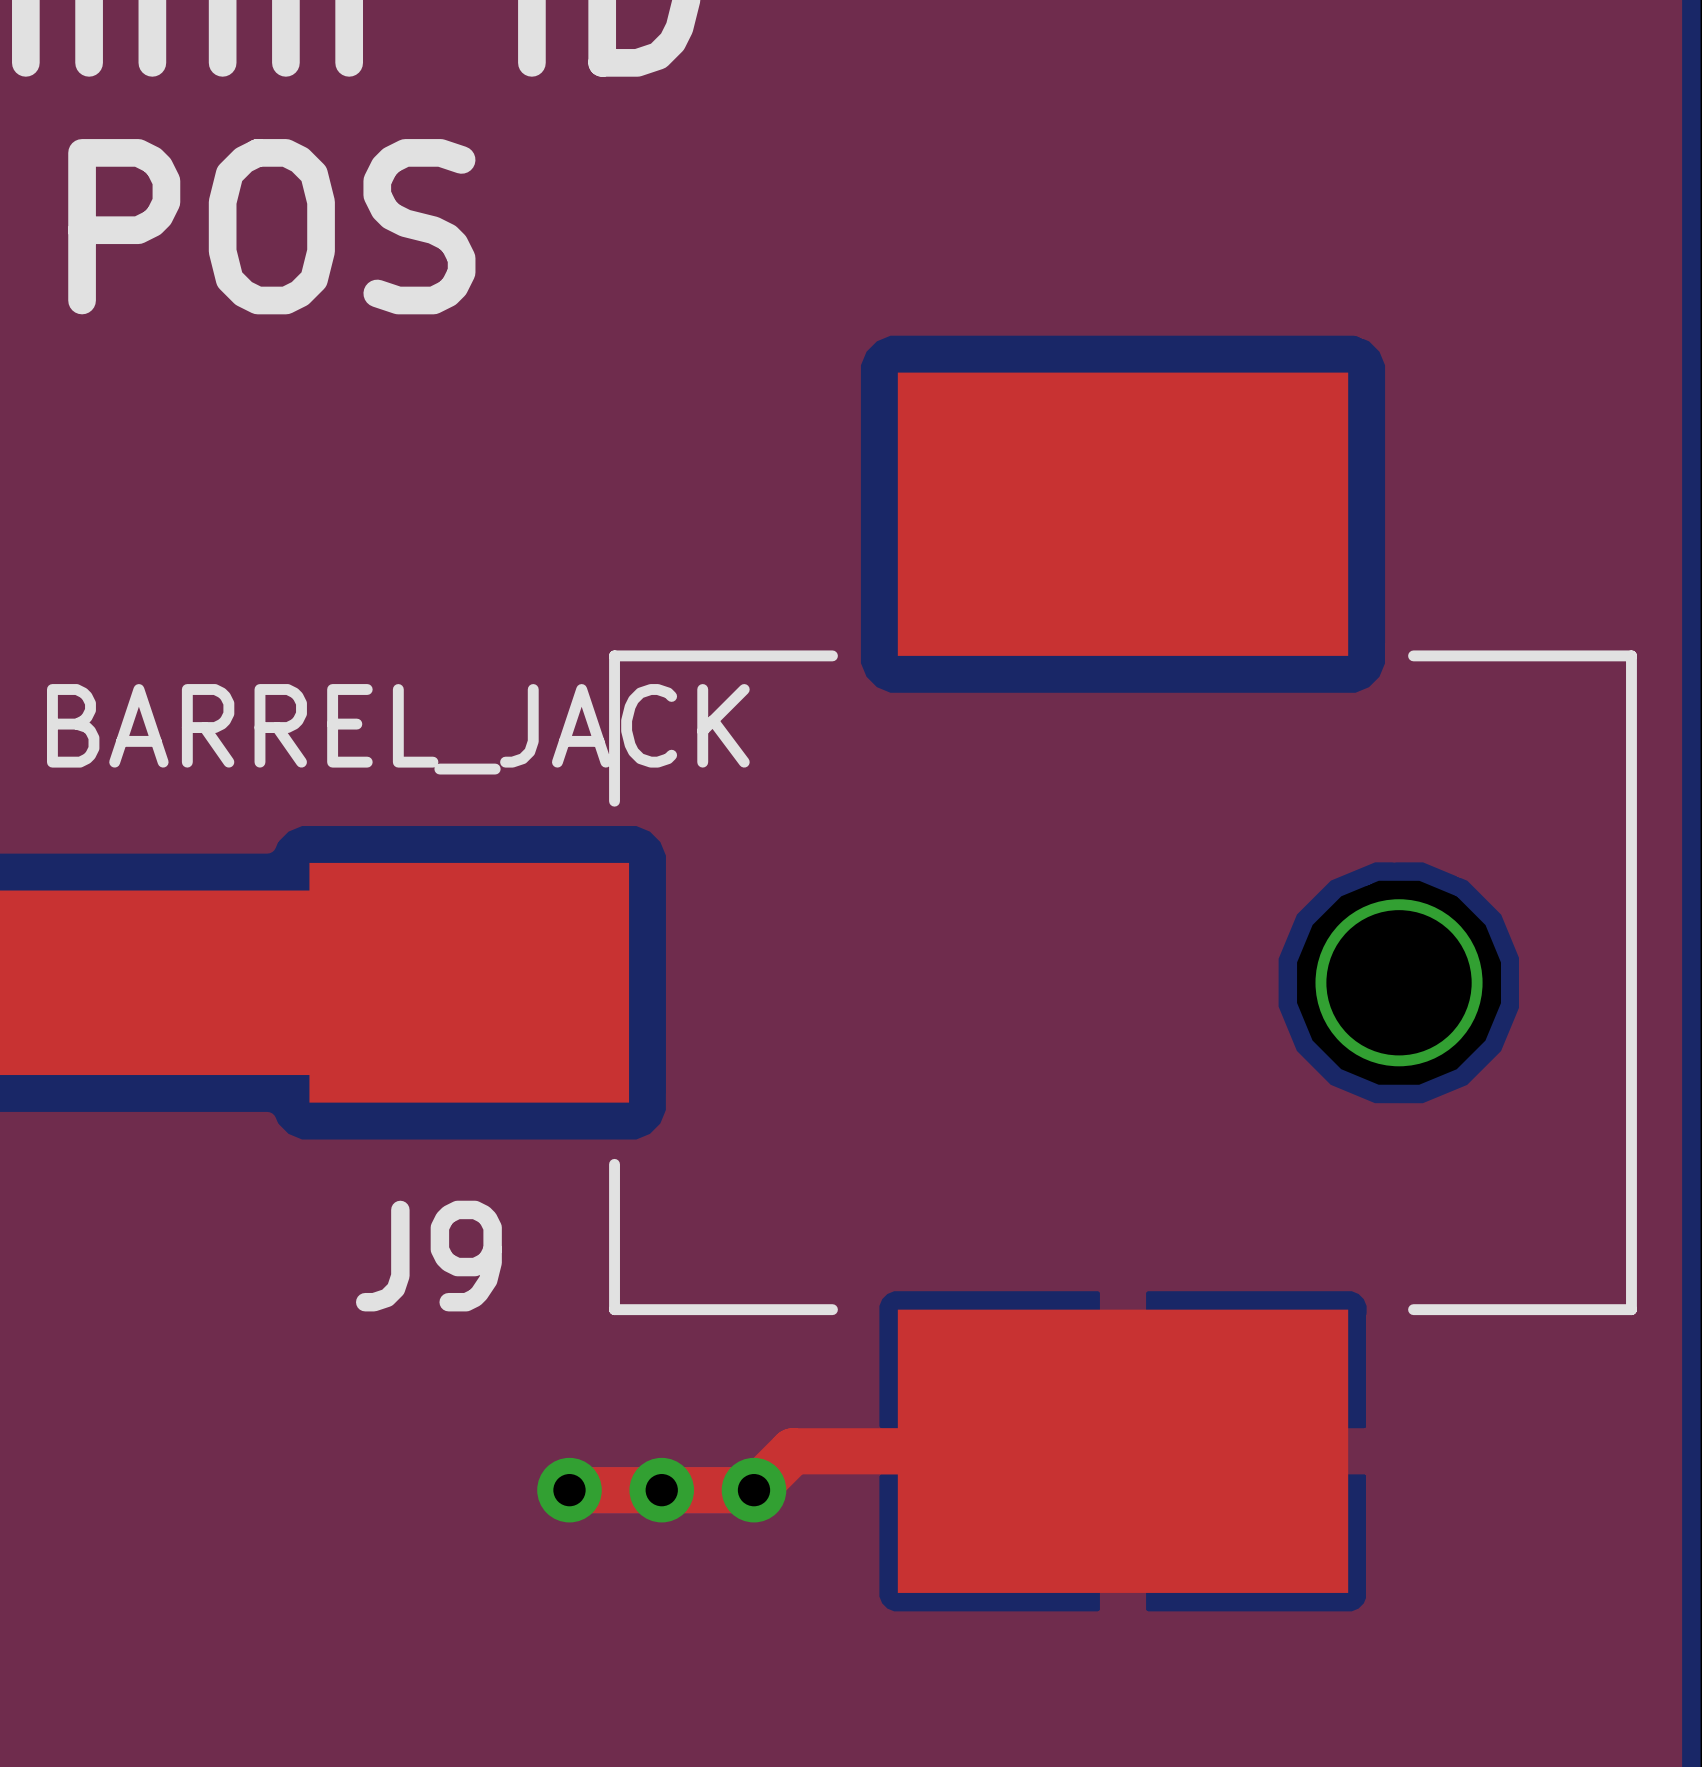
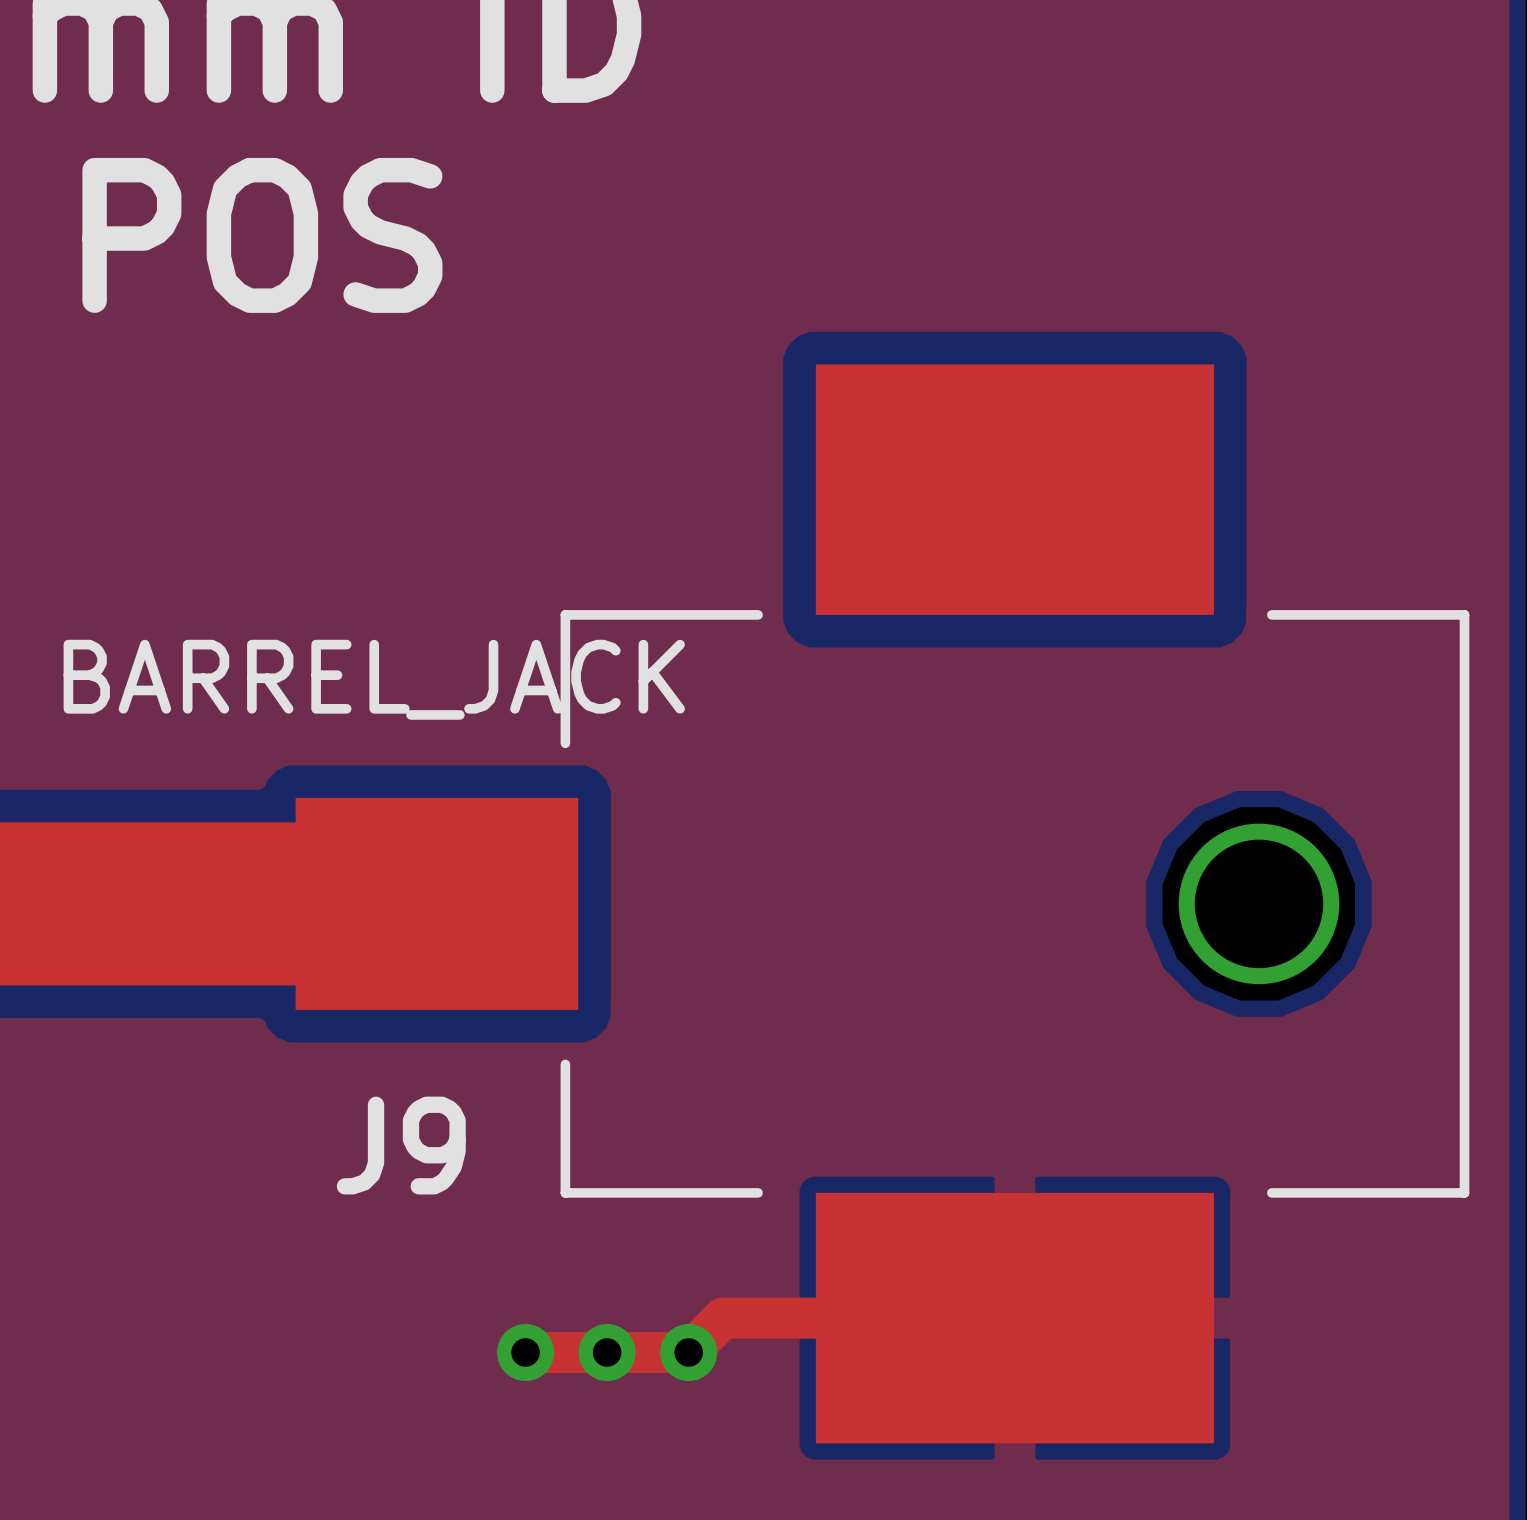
J9 footprint: [309, 372, 1637, 1593] -> [295, 364, 1470, 1444]

